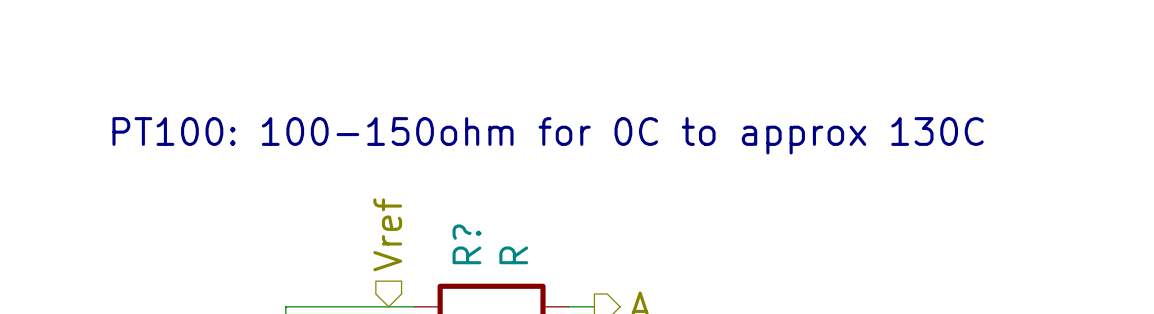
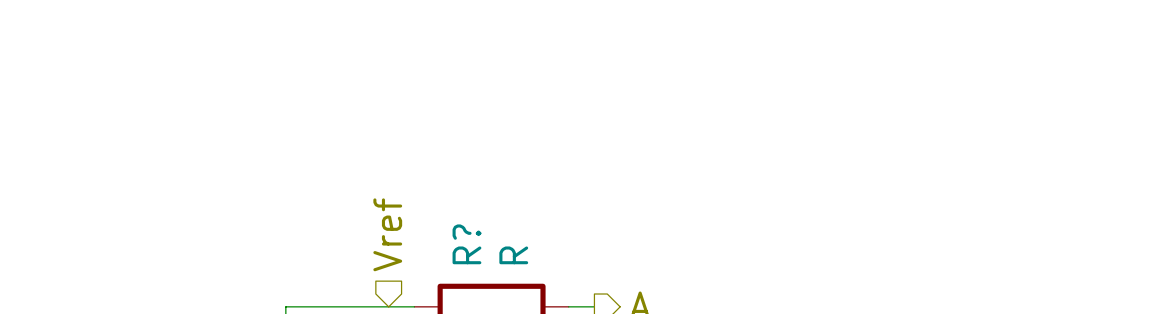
text: PT100: 100-150ohm for 0C to approx 130C (548, 135) -> none

